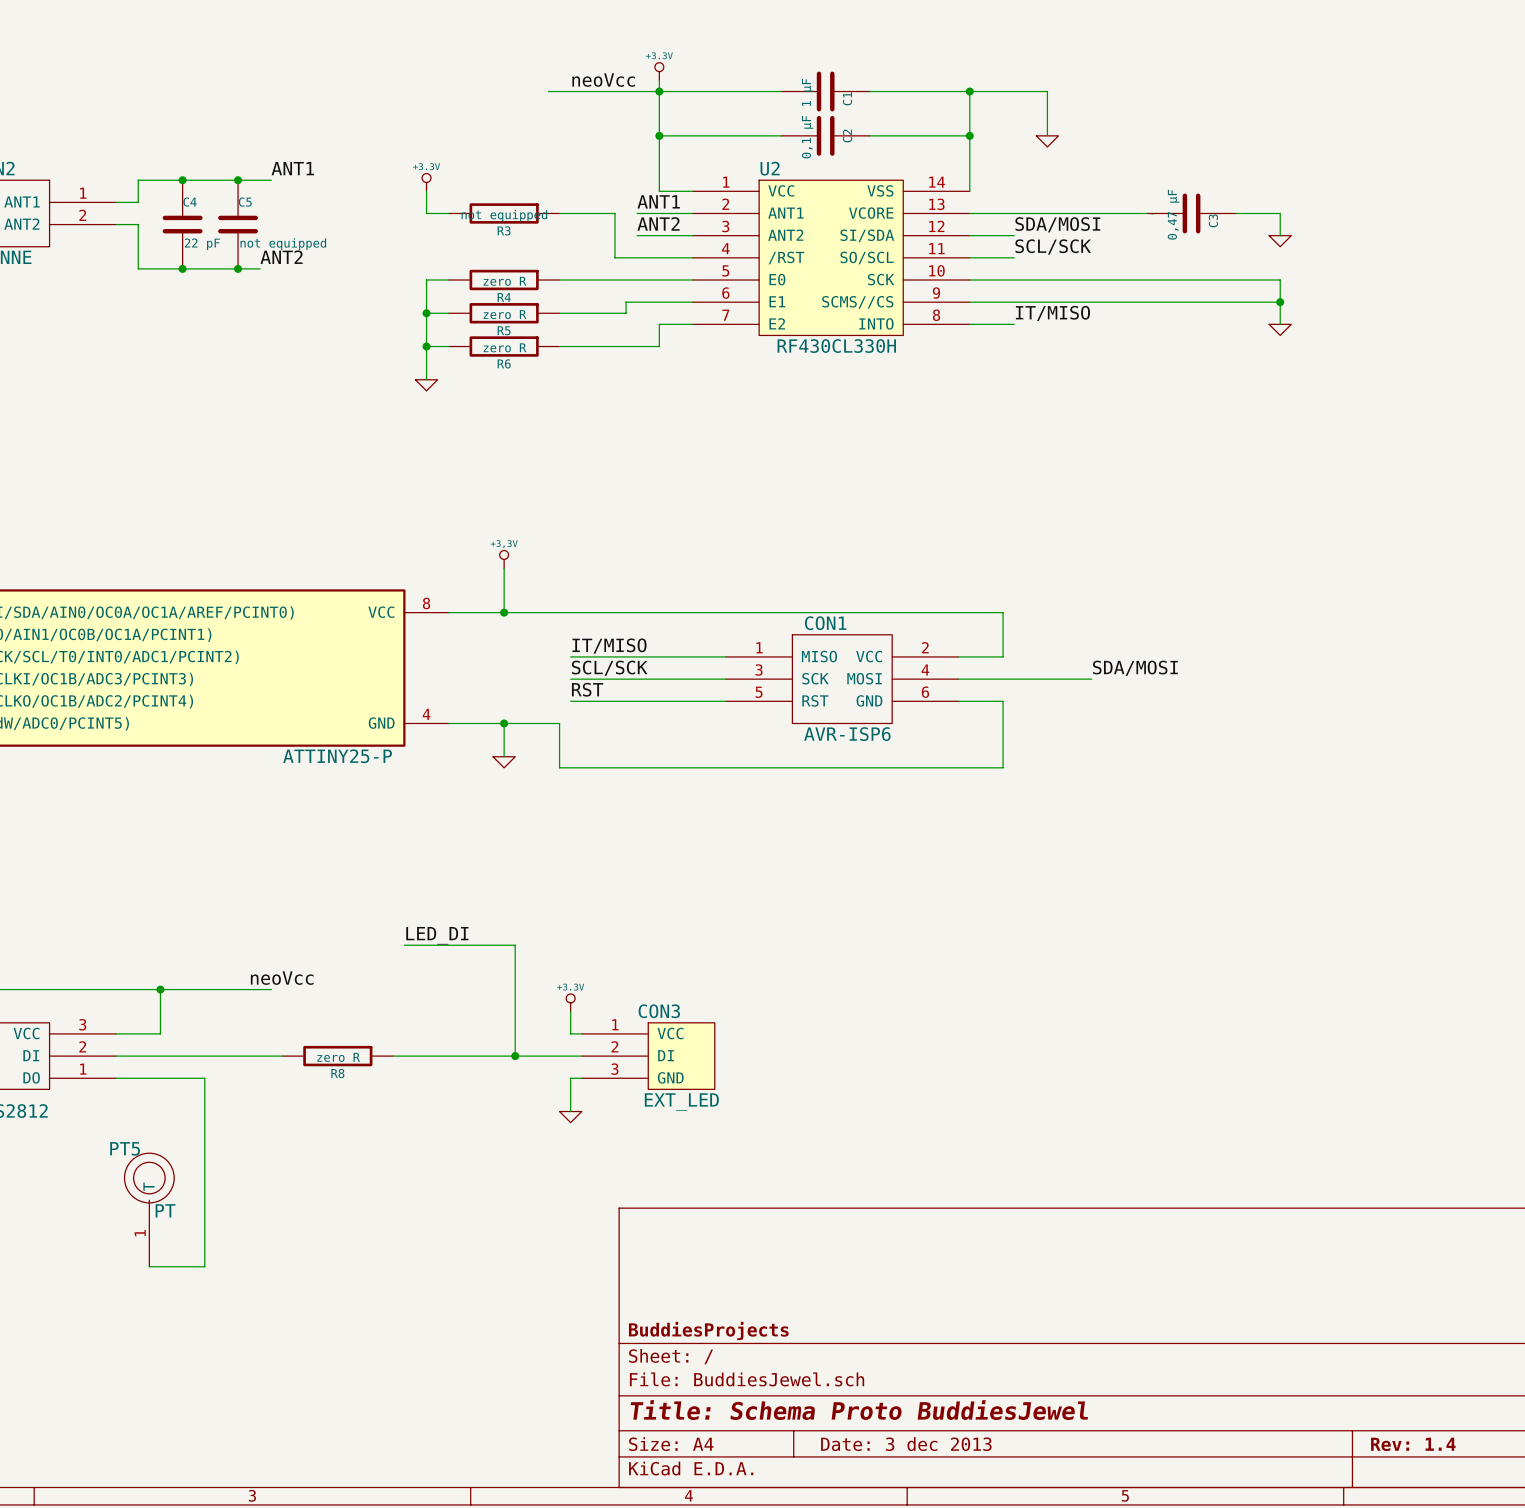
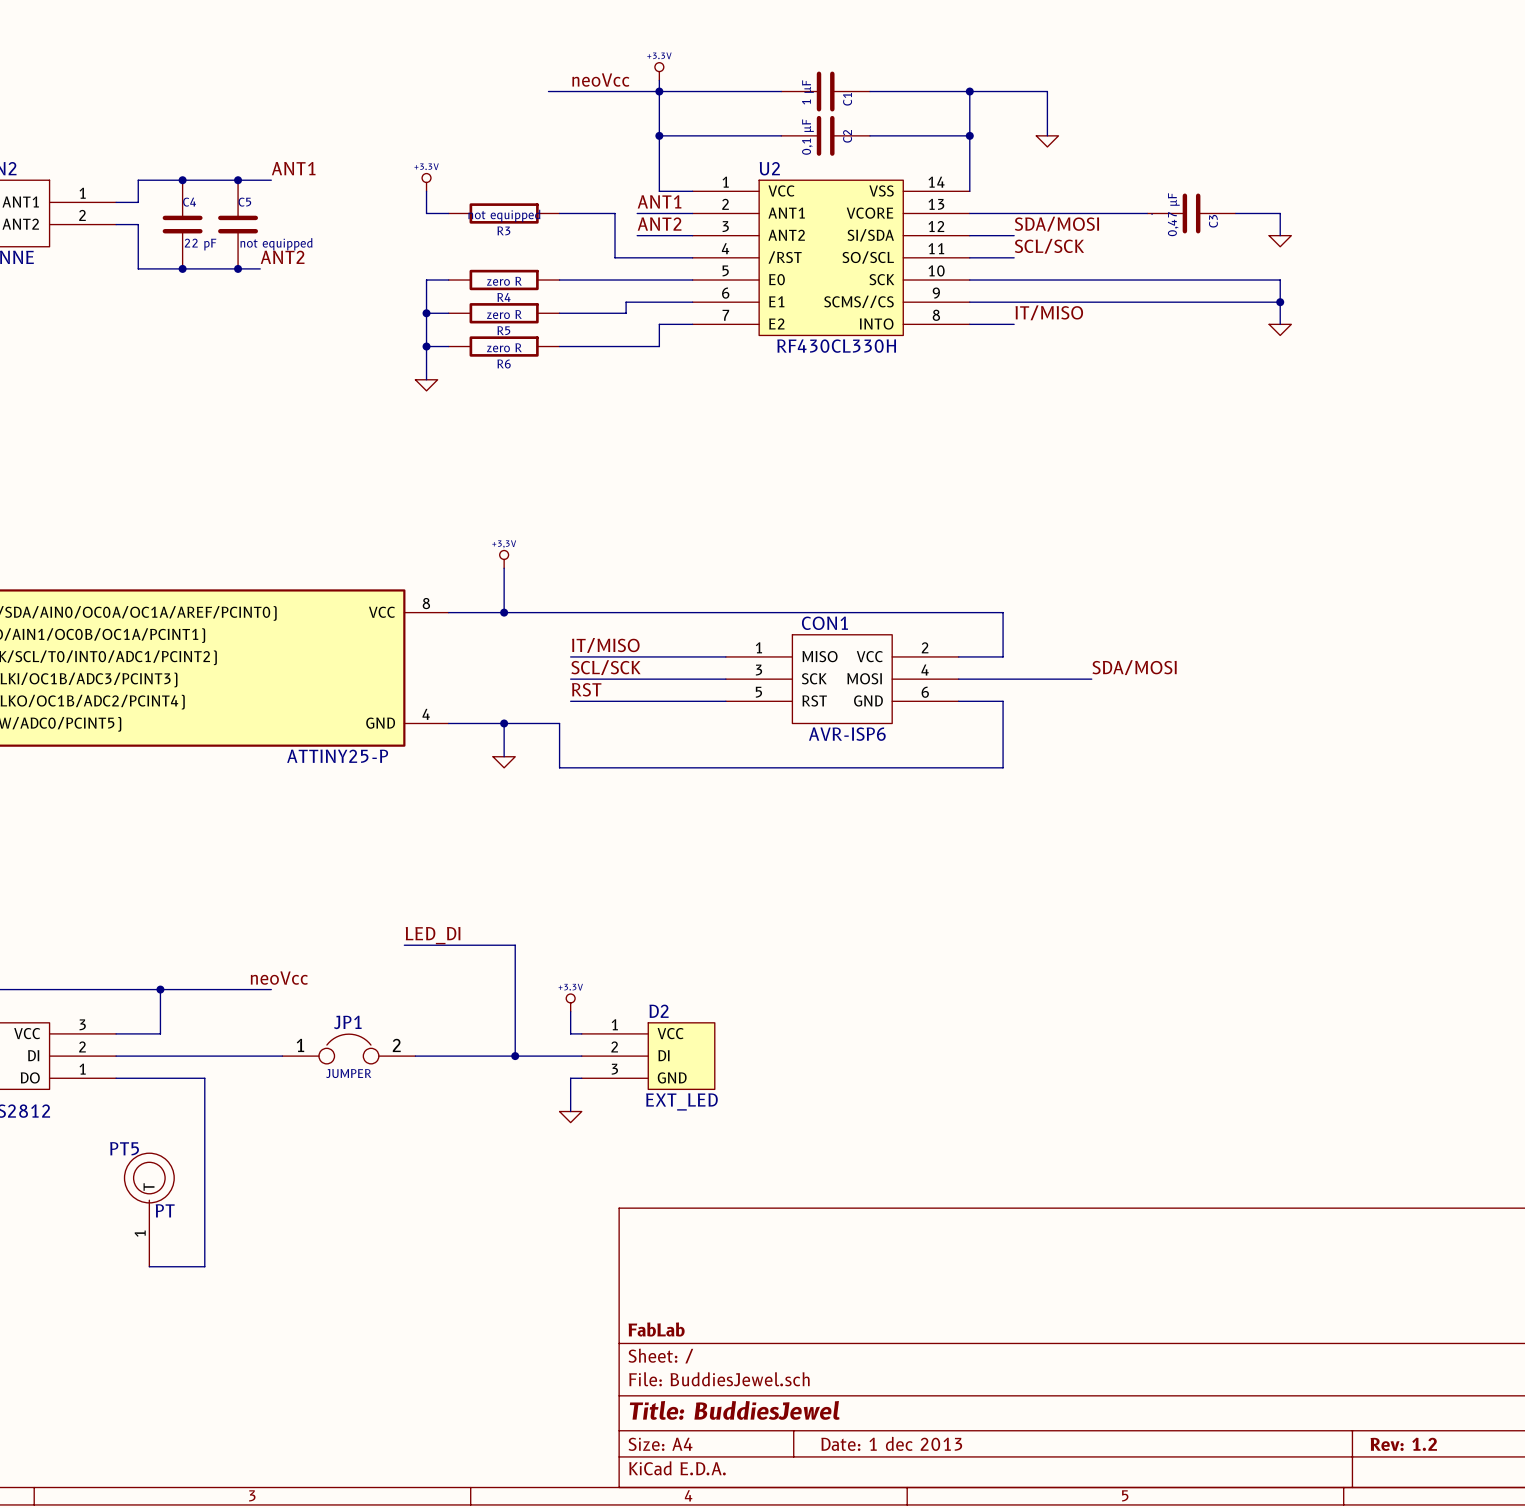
CON3 name: CON3 (659, 1011) -> D2 (659, 1011)
JP1: none -> JUMPER (348, 1049)
R8: zero R (337, 1056) -> none
title block: BuddiesProjects (708, 1330) -> FabLab (656, 1329)
title block: Title: Schema Proto BuddiesJewel (859, 1410) -> Title: BuddiesJewel (734, 1410)
title block: Date: 3 dec 2013 (906, 1444) -> Date: 1 dec 2013 (891, 1443)
title block: Rev: 1.4 (1413, 1444) -> Rev: 1.2 (1403, 1444)

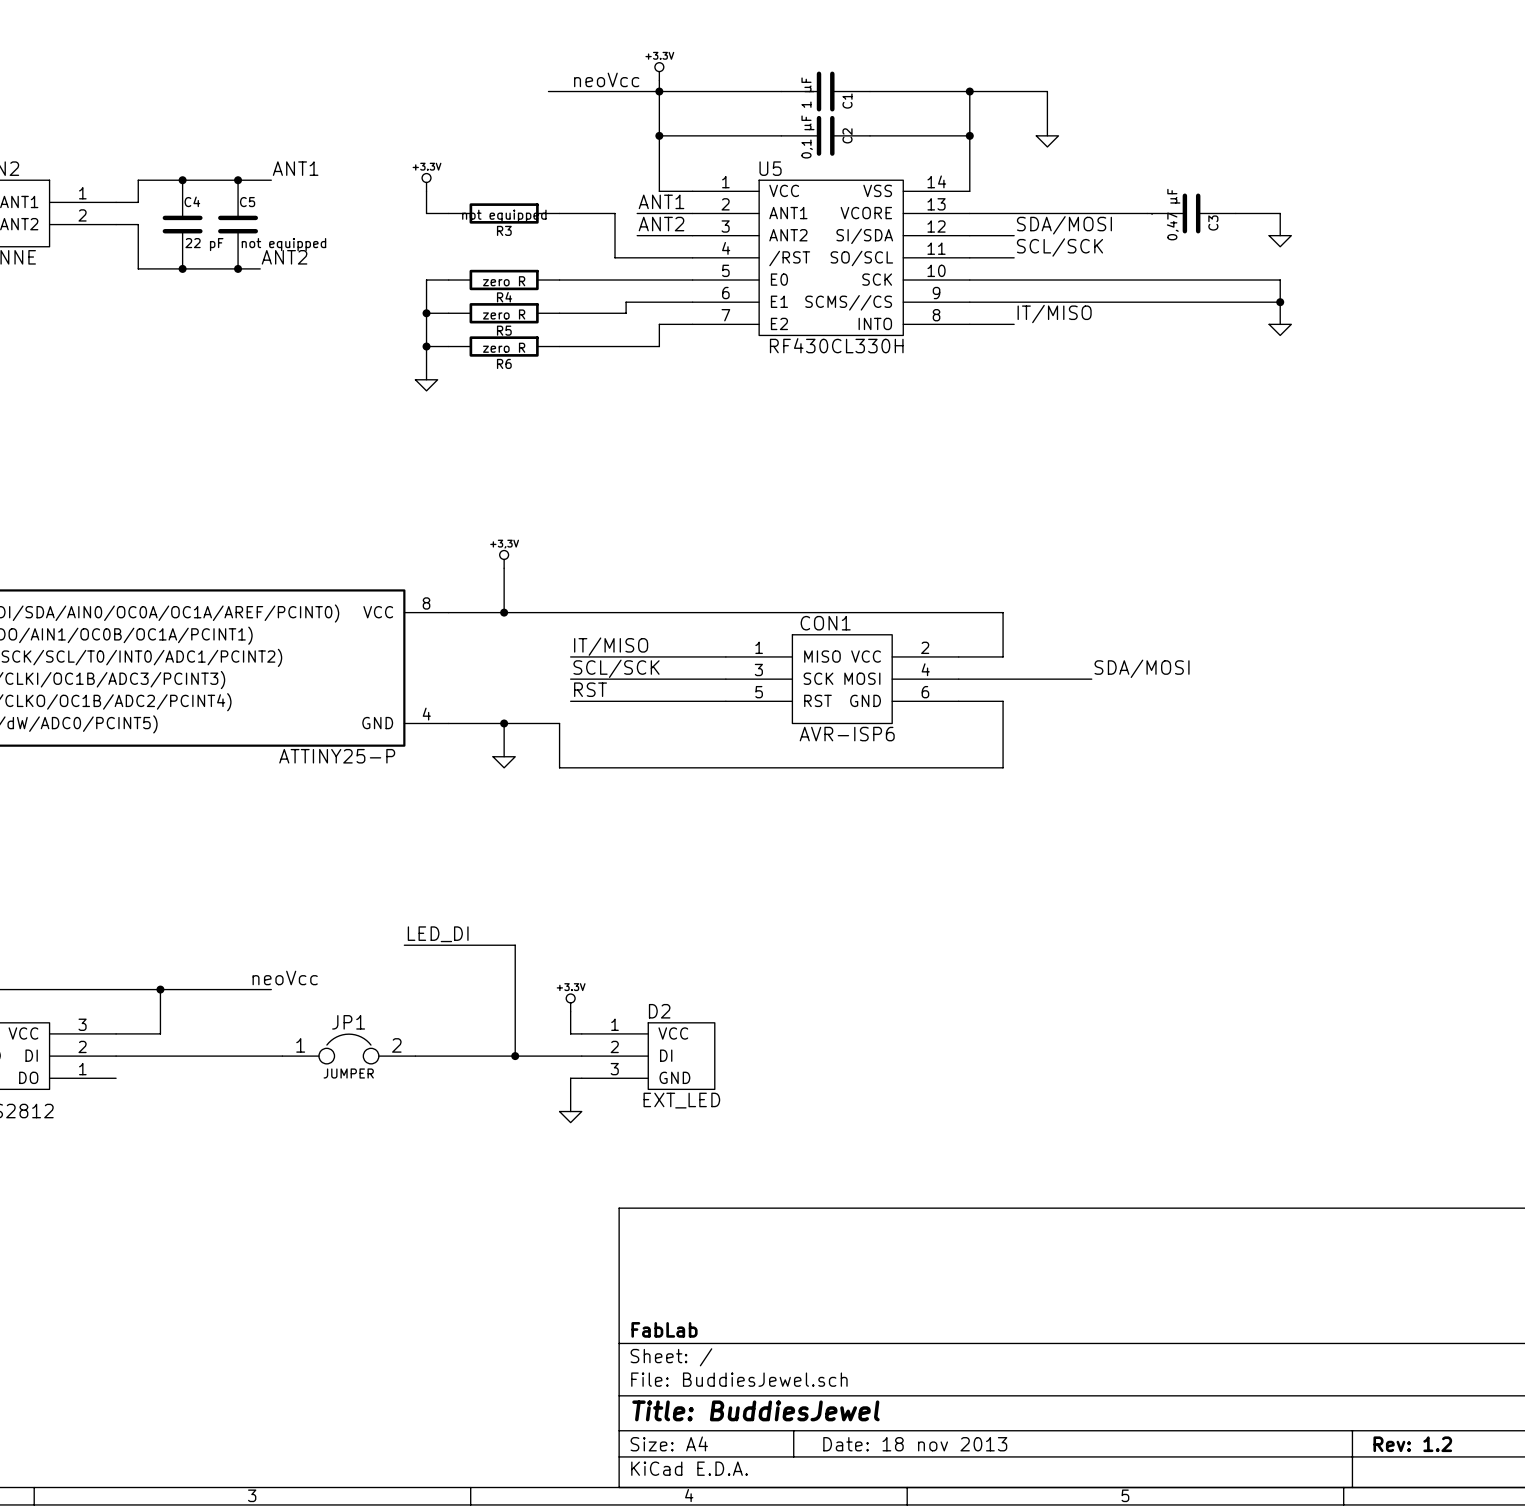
U2 name: U2 (769, 168) -> U5 (770, 168)
wire: (116, 1078) (204, 1078) (204, 1266) (149, 1266) -> none
PT5: PT (149, 1209) -> none
title block: Date: 1 dec 2013 (891, 1443) -> Date: 18 nov 2013 (915, 1444)

